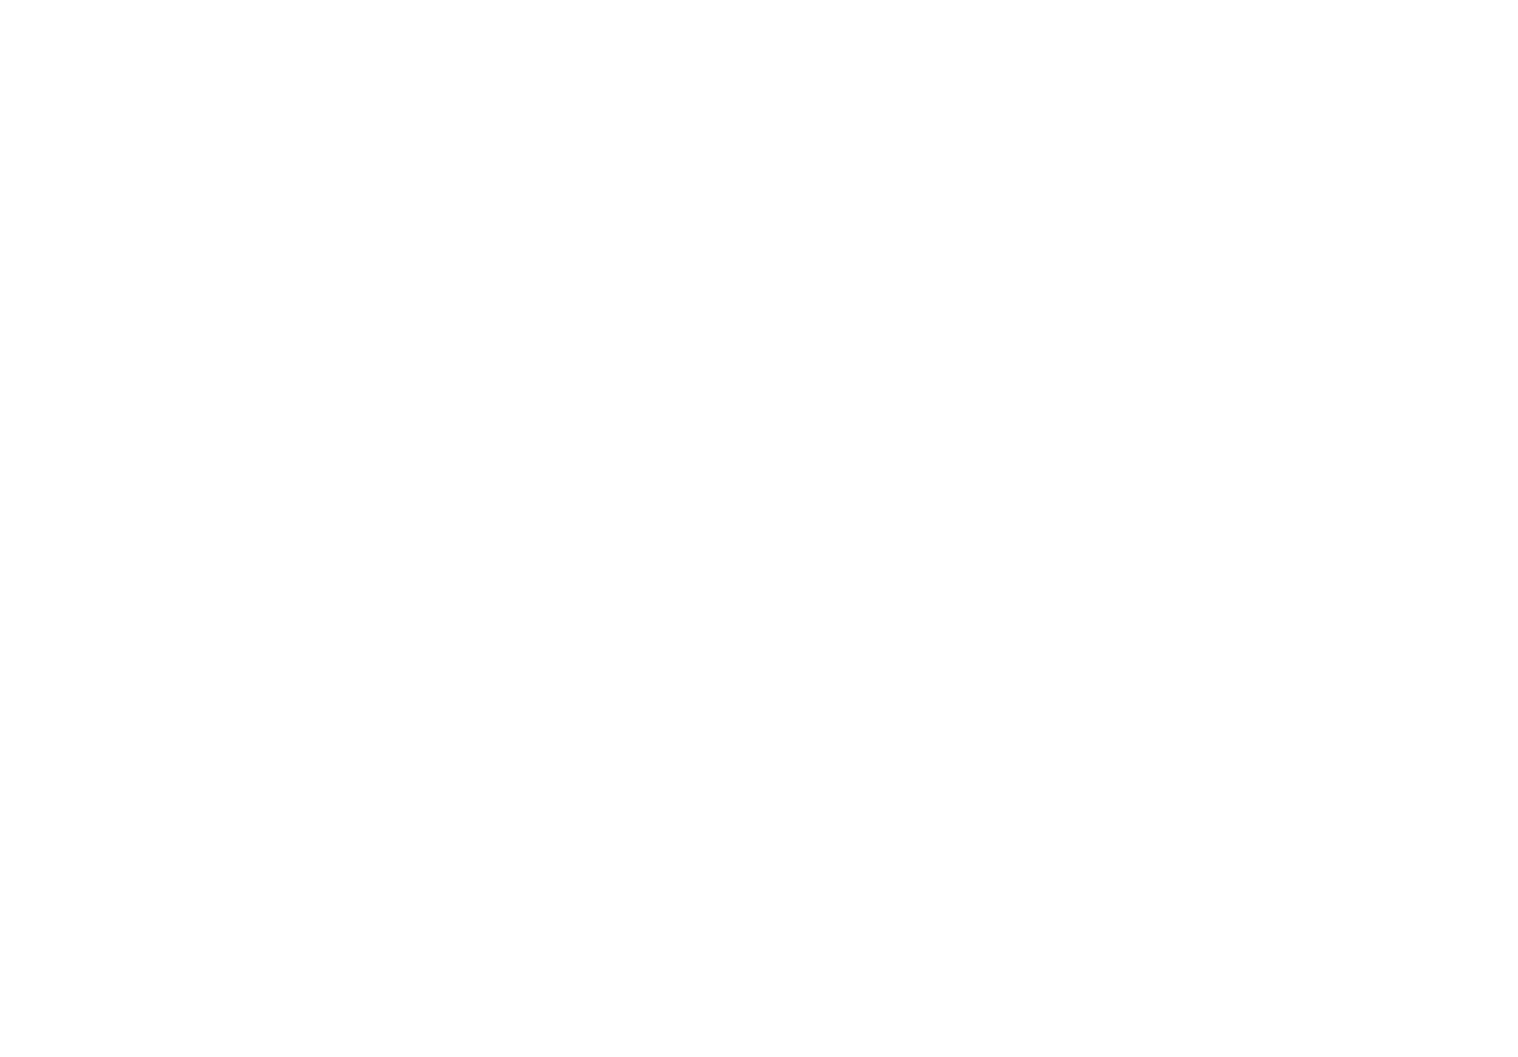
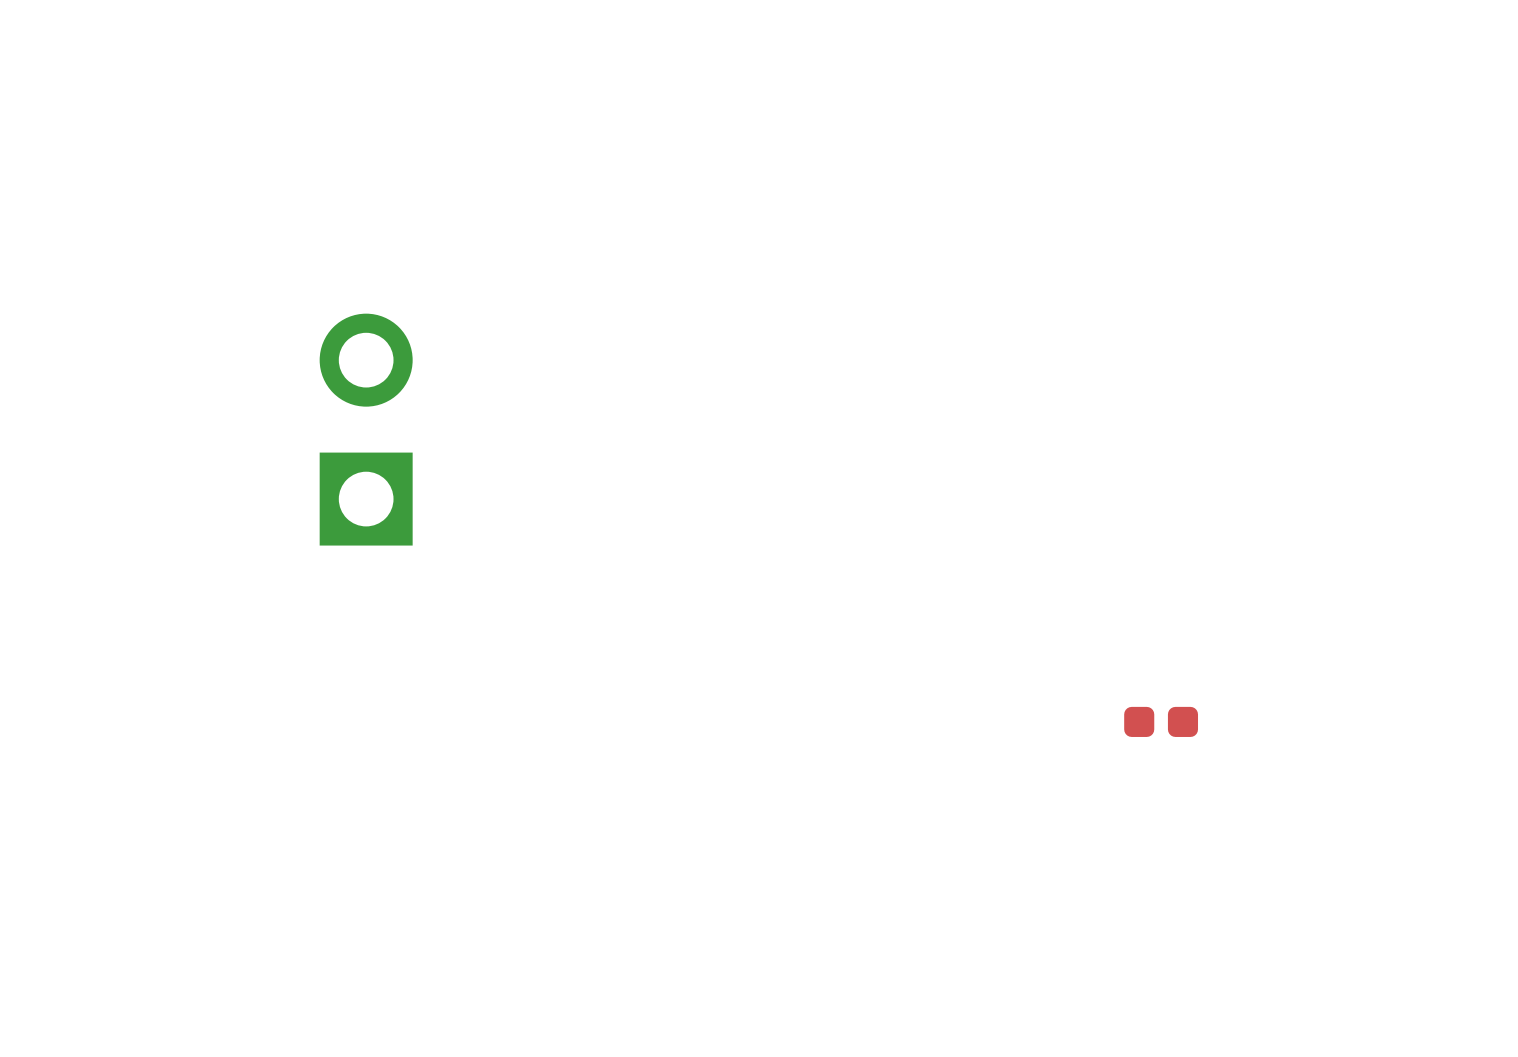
part: none -> (366, 429)
part: none -> (1161, 721)

